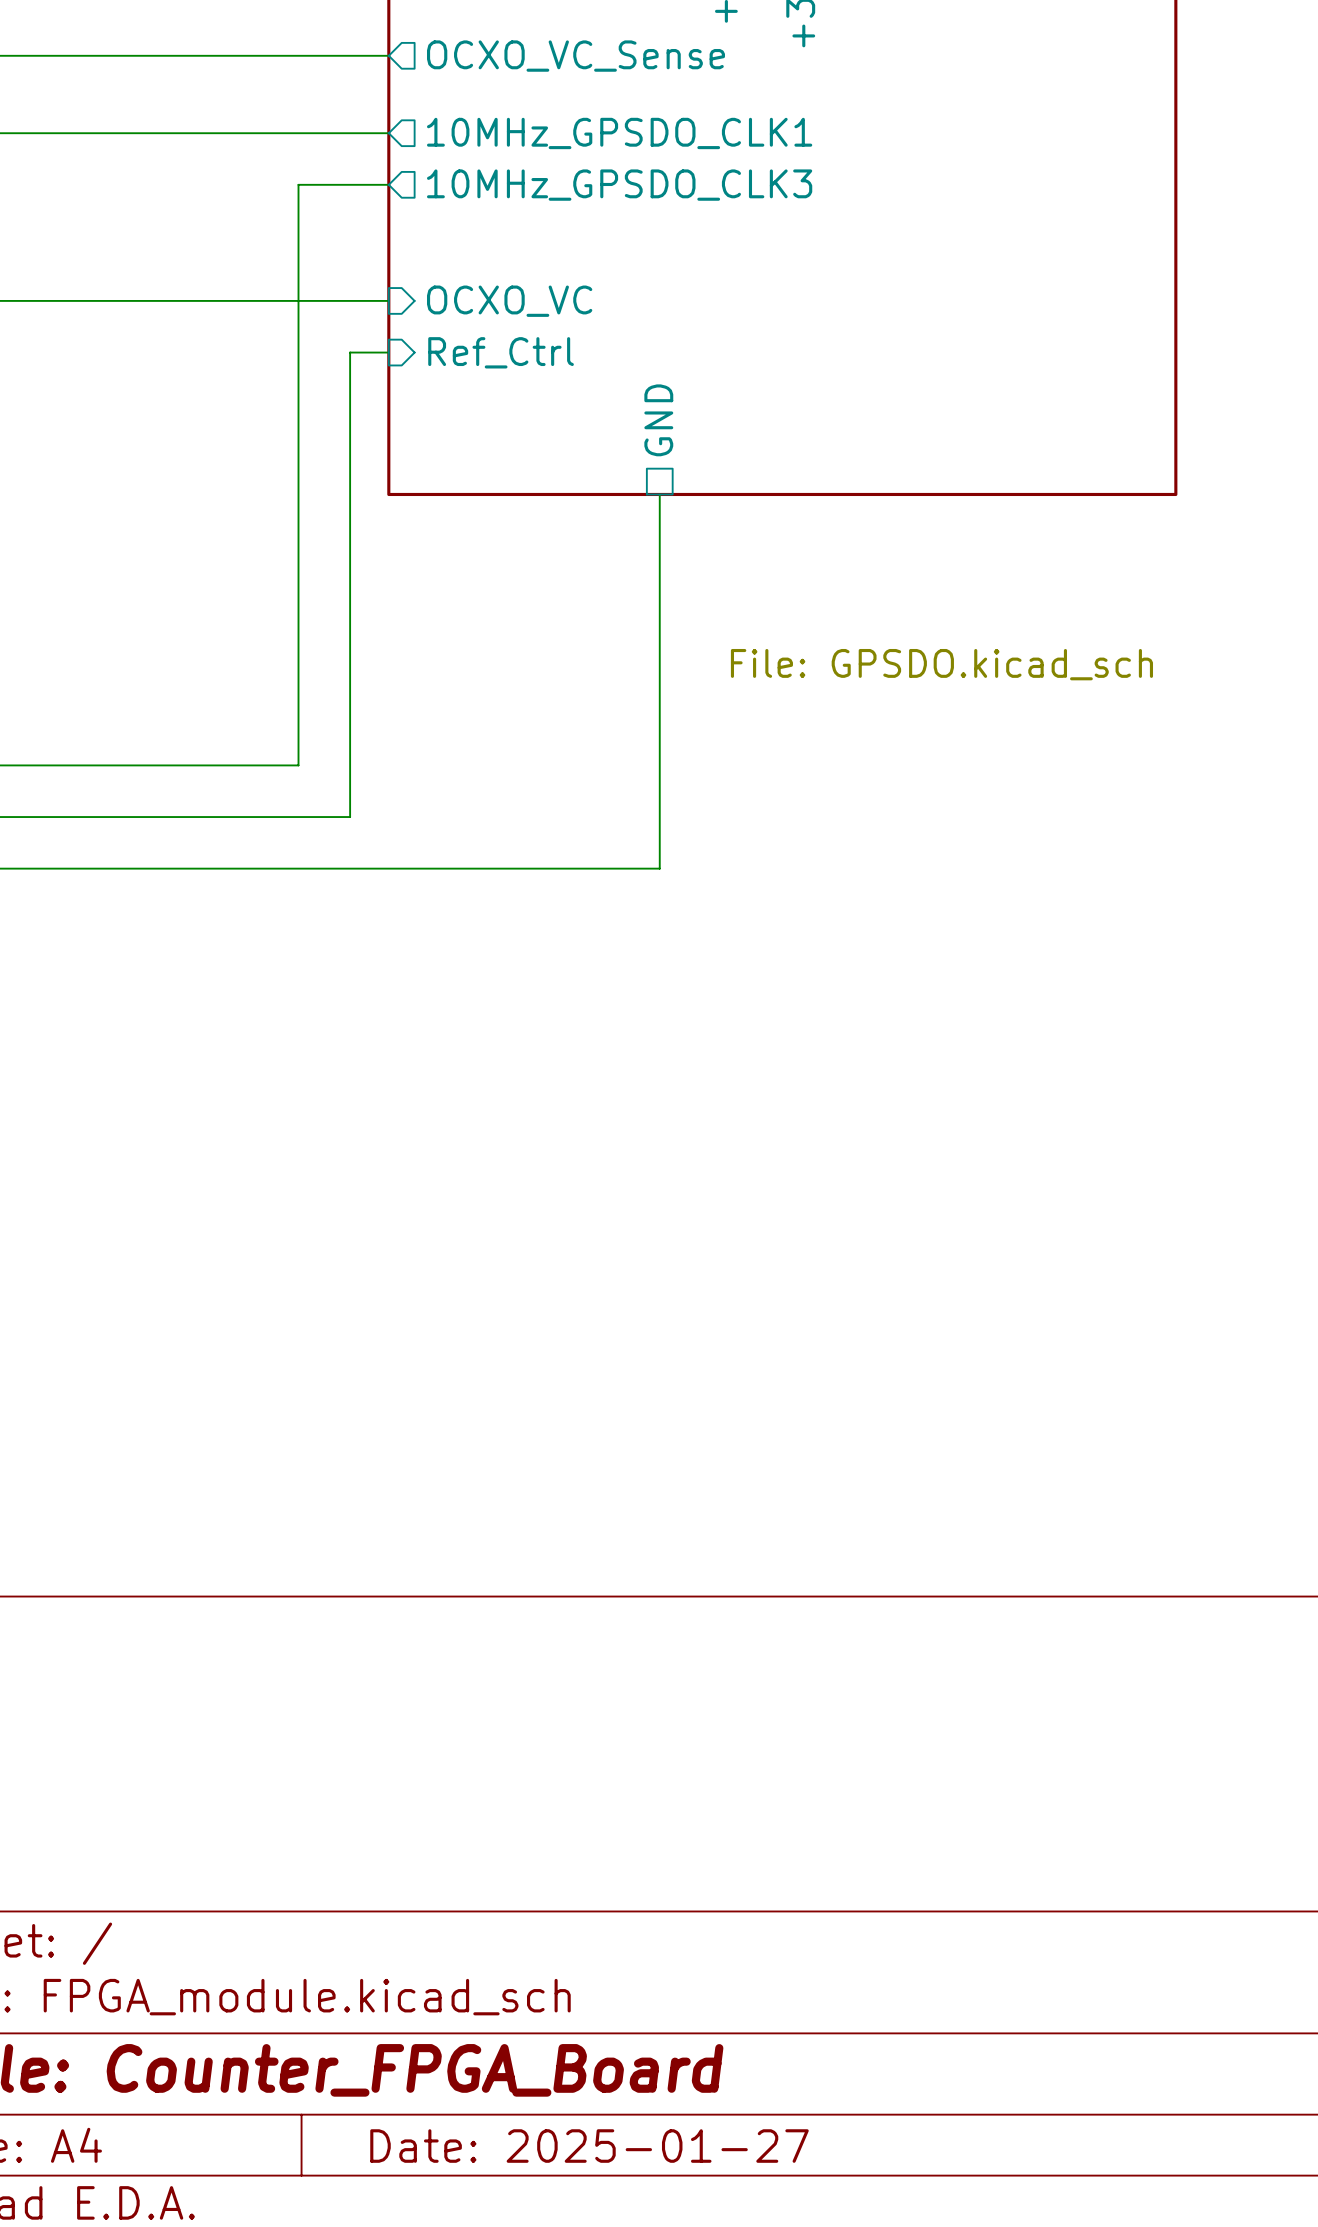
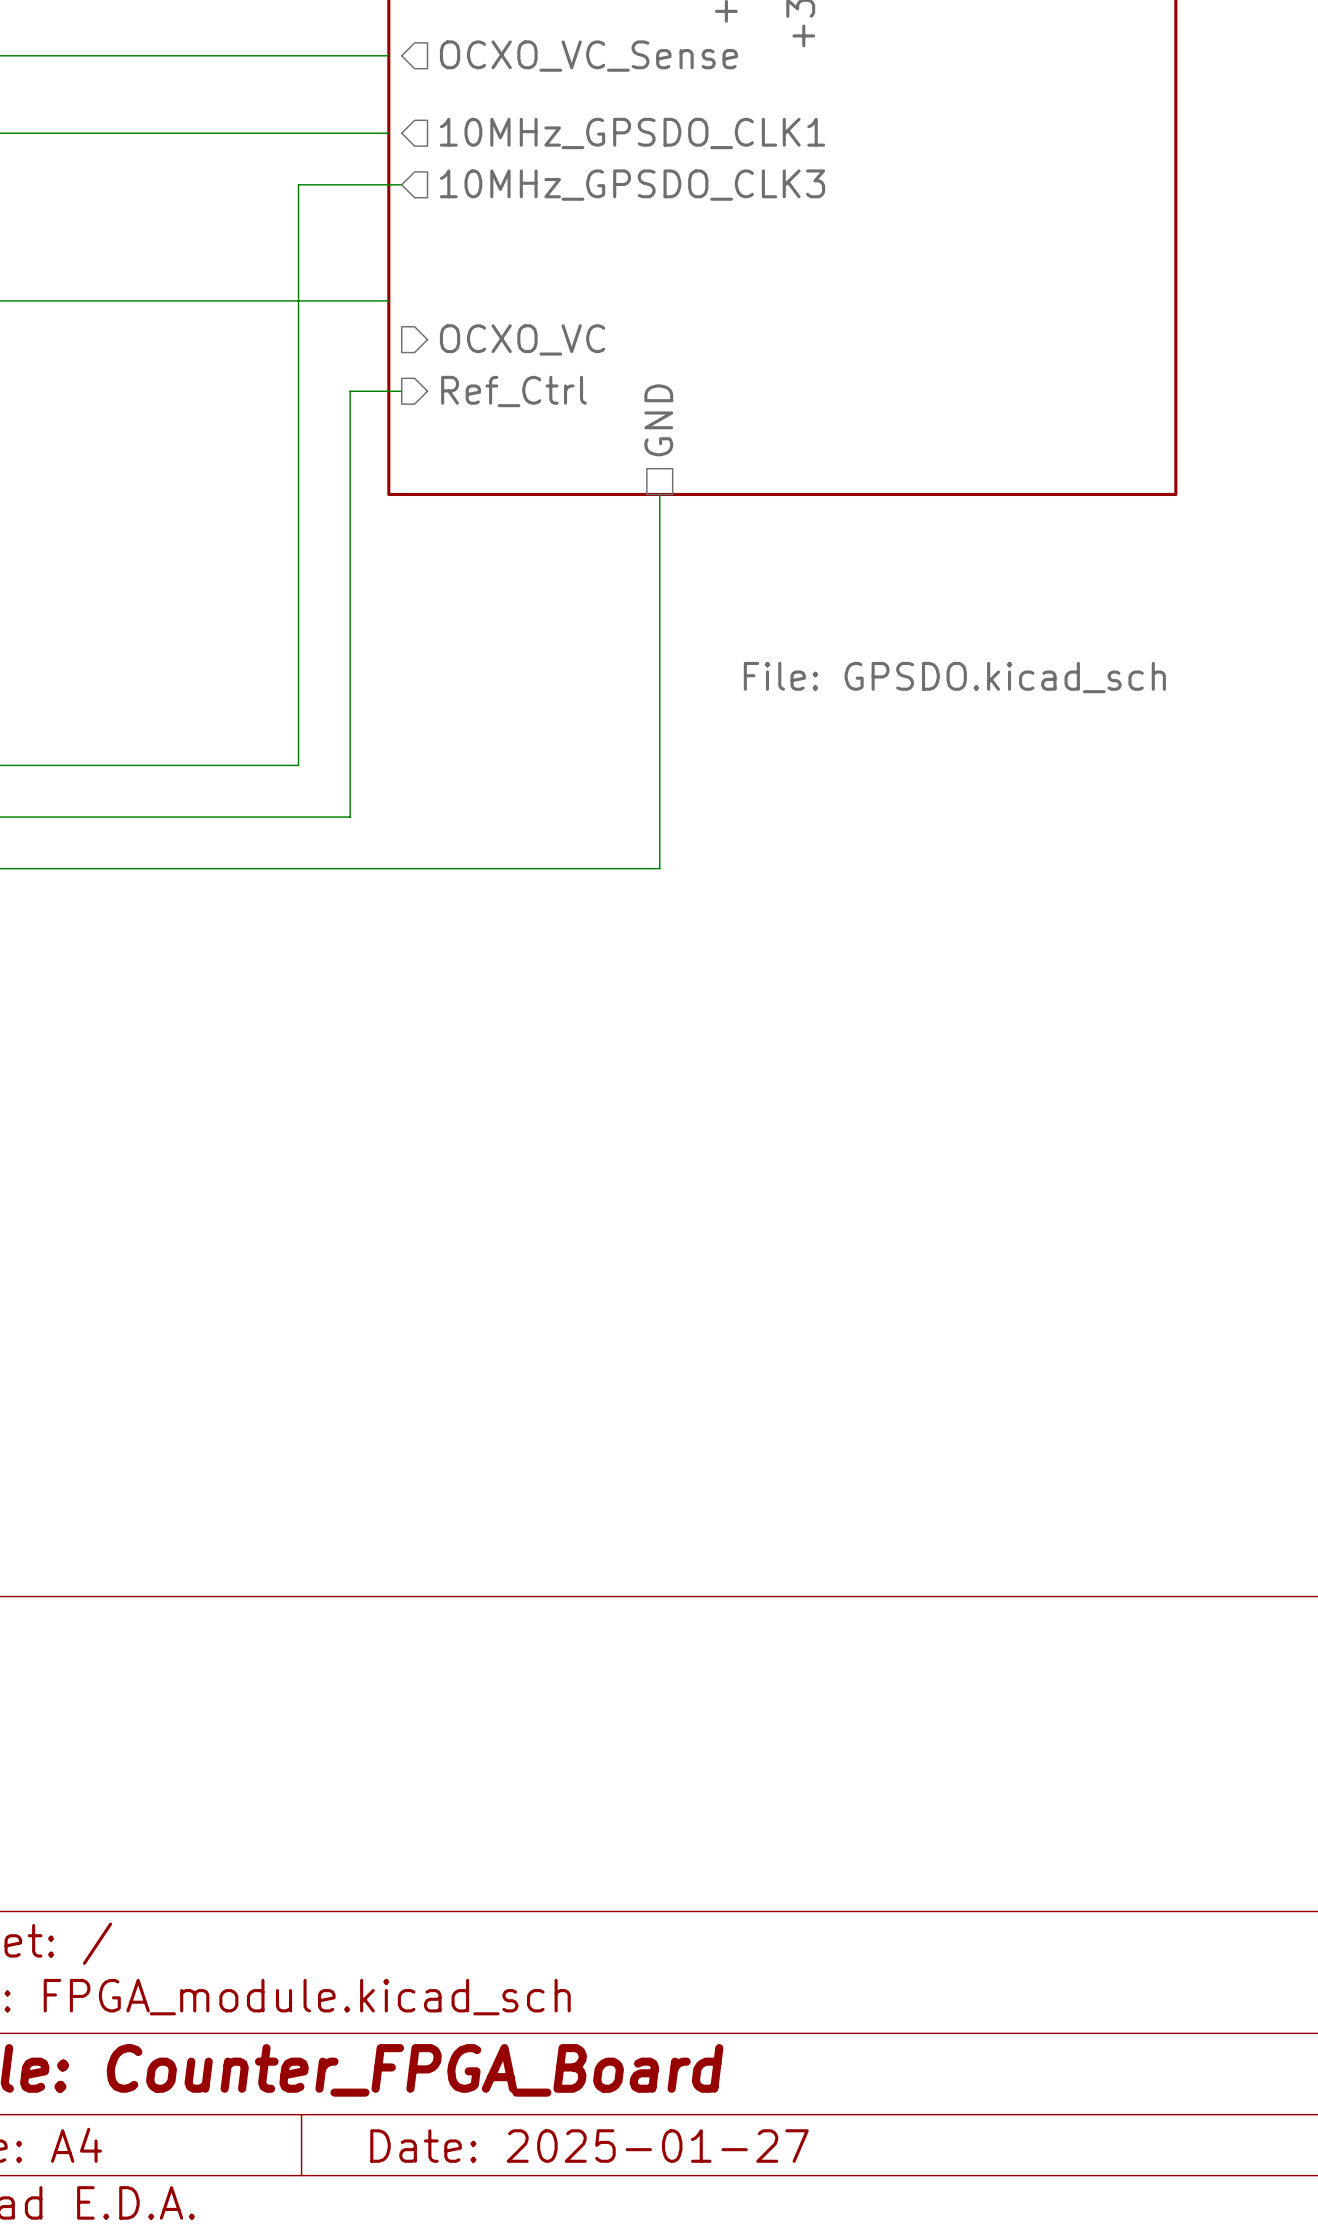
sheet pin position: OCXO_VC_Sense (575, 56) -> OCXO_VC_Sense (588, 56)
sheet pin position: 10MHz_GPSDO_CLK1 (619, 133) -> 10MHz_GPSDO_CLK1 (632, 133)
wire: none -> (388, 184) (401, 184)
sheet pin position: 10MHz_GPSDO_CLK3 (619, 185) -> 10MHz_GPSDO_CLK3 (632, 185)
sheet pin position: OCXO_VC (509, 301) -> OCXO_VC (522, 339)
wire: (388, 352) (350, 352) (350, 391) -> (401, 391) (350, 391)
sheet pin position: Ref_Ctrl (501, 352) -> Ref_Ctrl (513, 391)
sheet value position: File: GPSDO.kicad_sch (941, 664) -> File: GPSDO.kicad_sch (954, 677)

